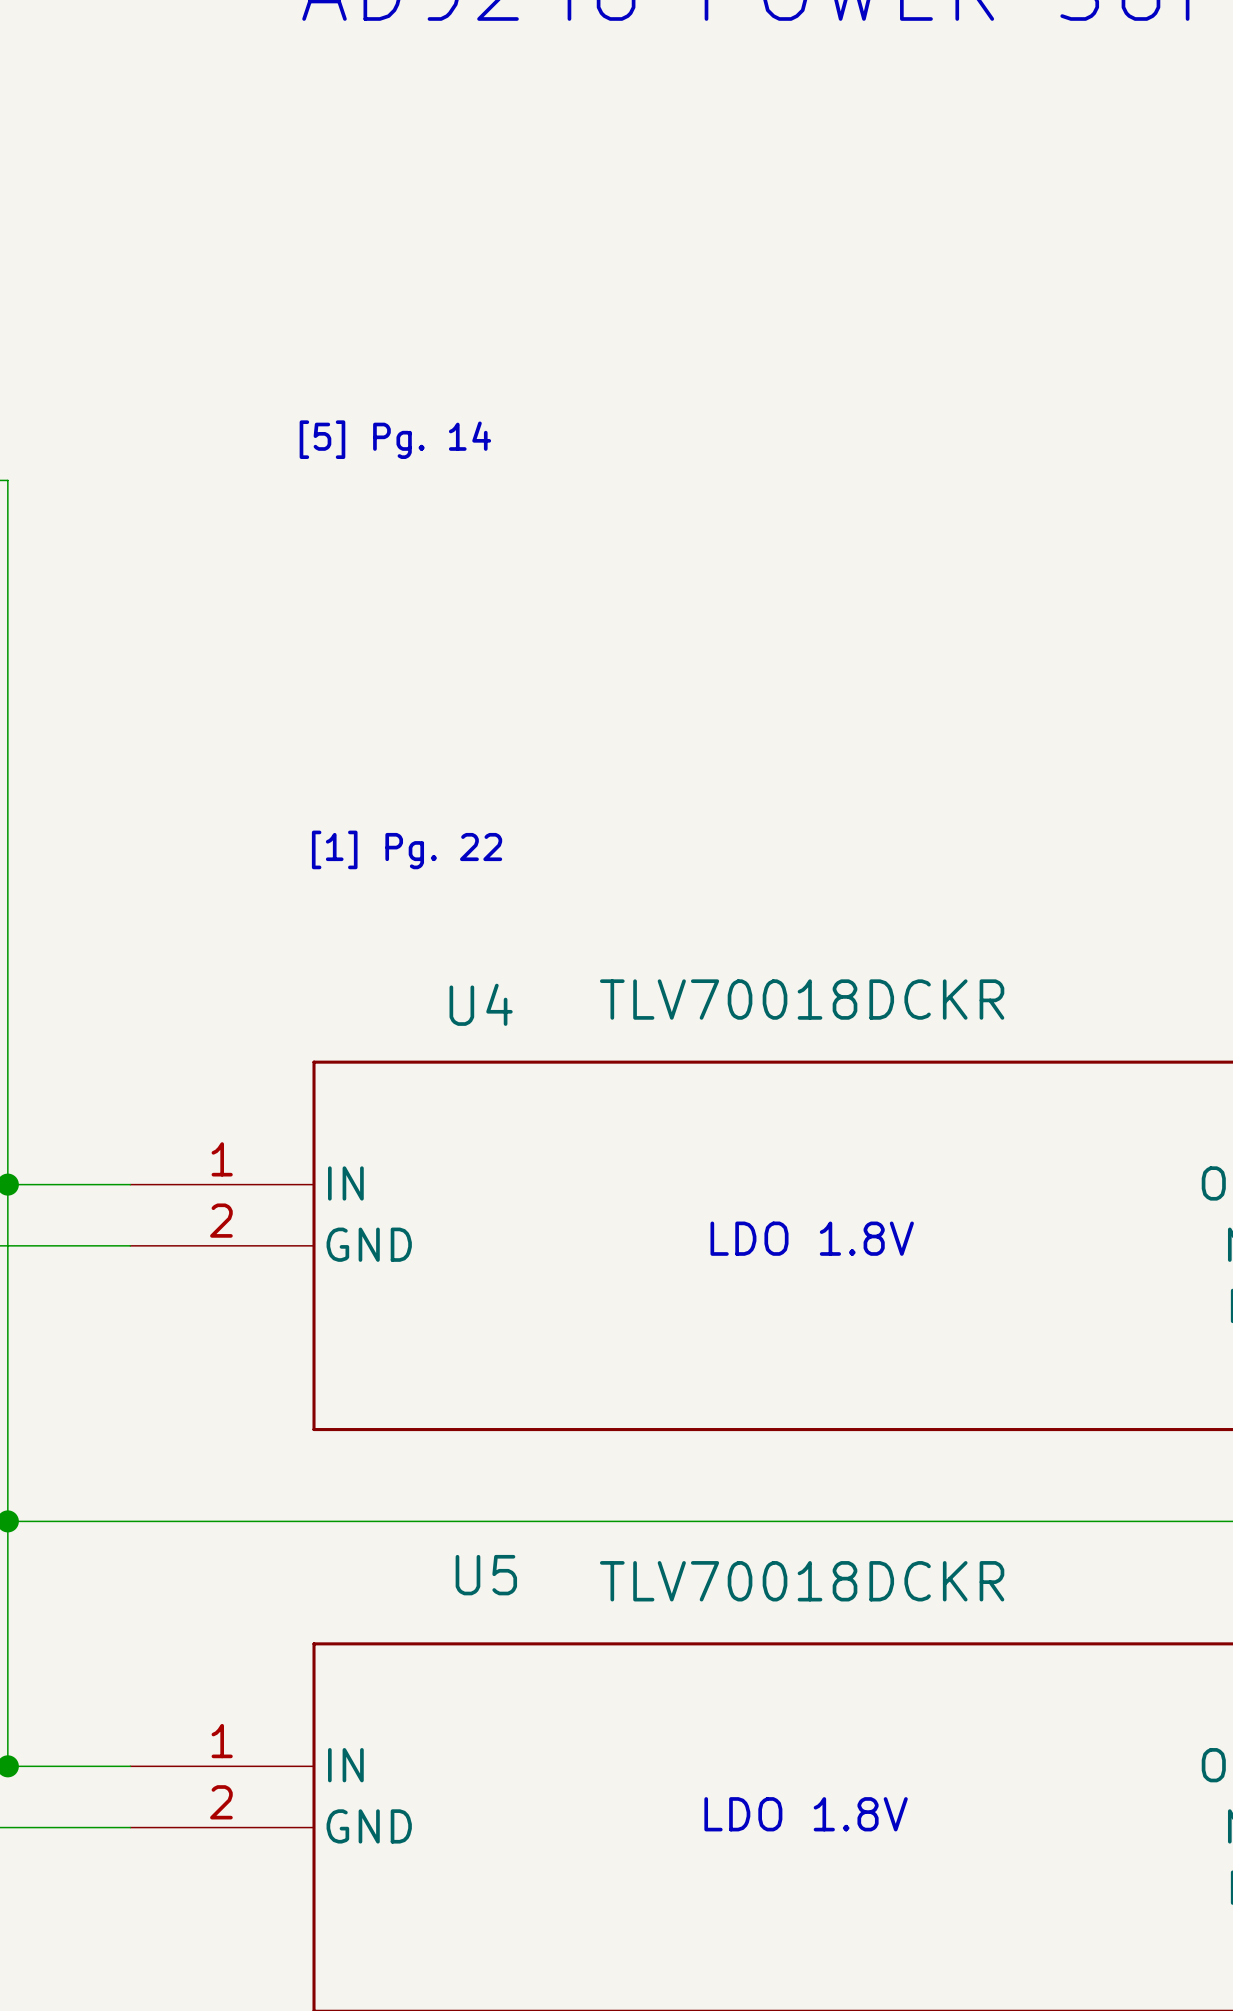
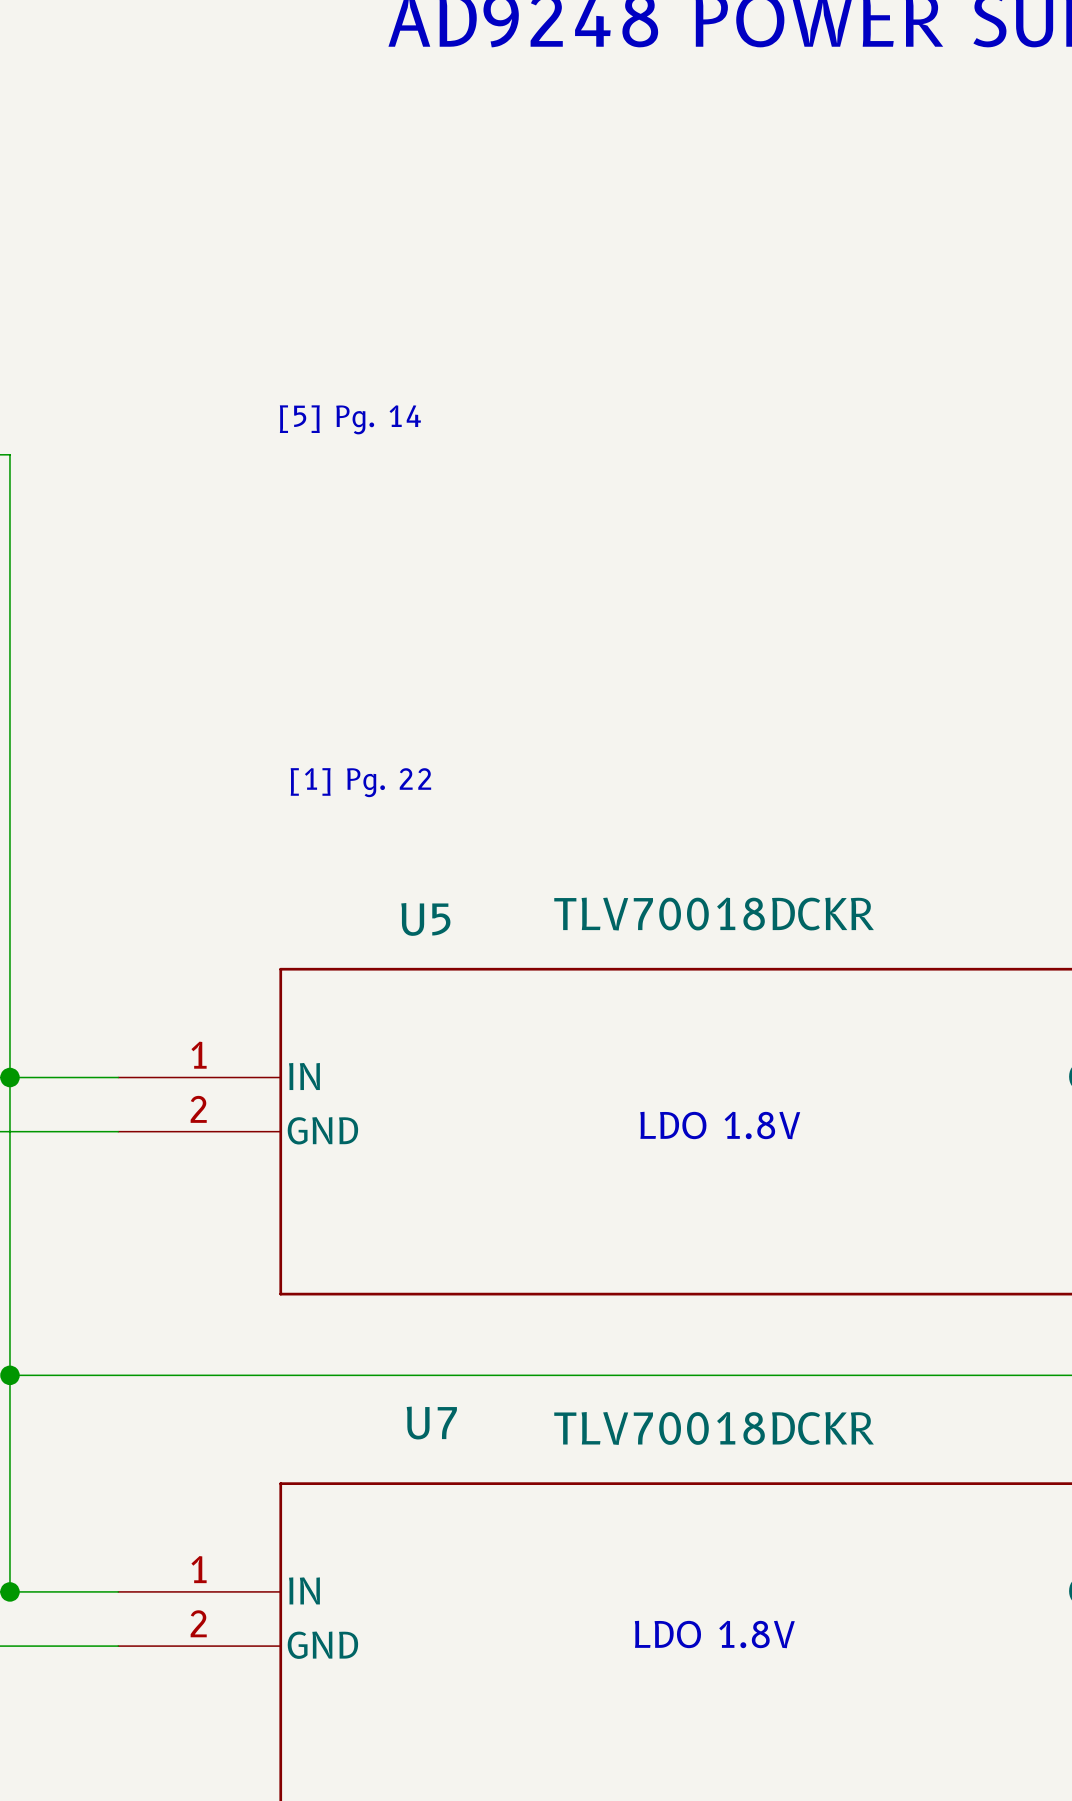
U4 name: U4 (481, 1004) -> U5 (425, 919)
U5 name: U5 (486, 1575) -> U7 (431, 1423)

